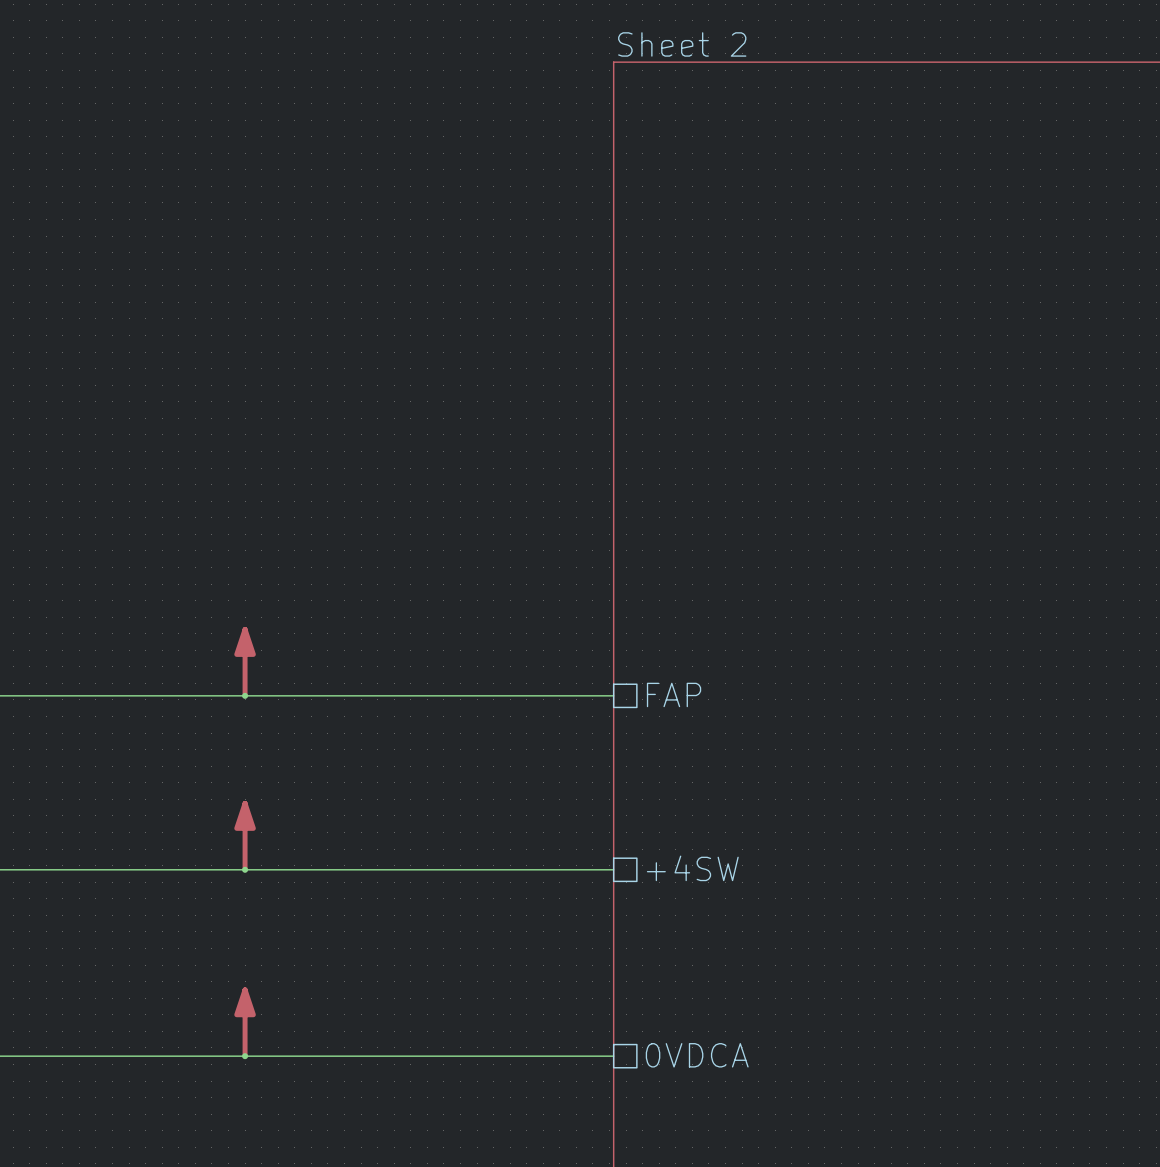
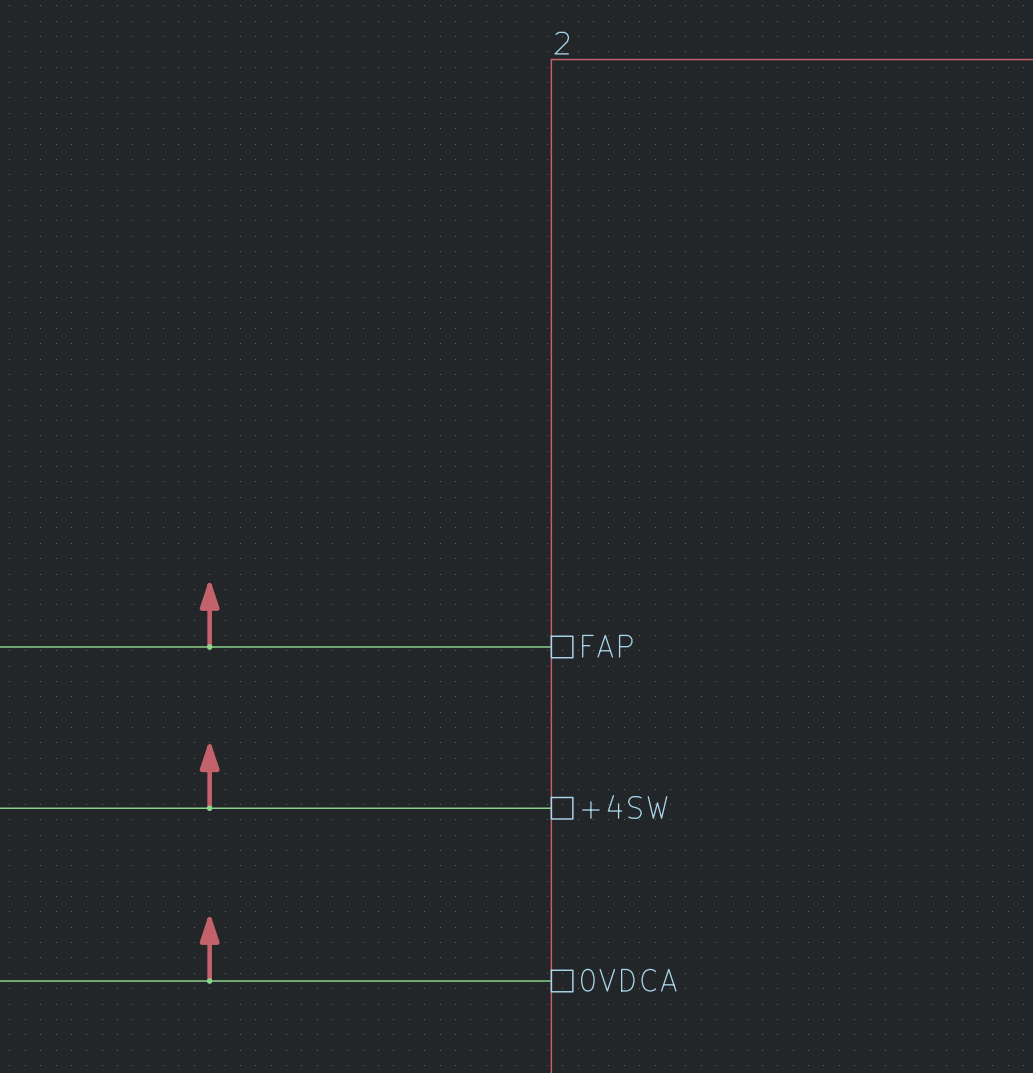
sheet Sheet 2 name: Sheet 2 (682, 44) -> 2 (561, 43)

